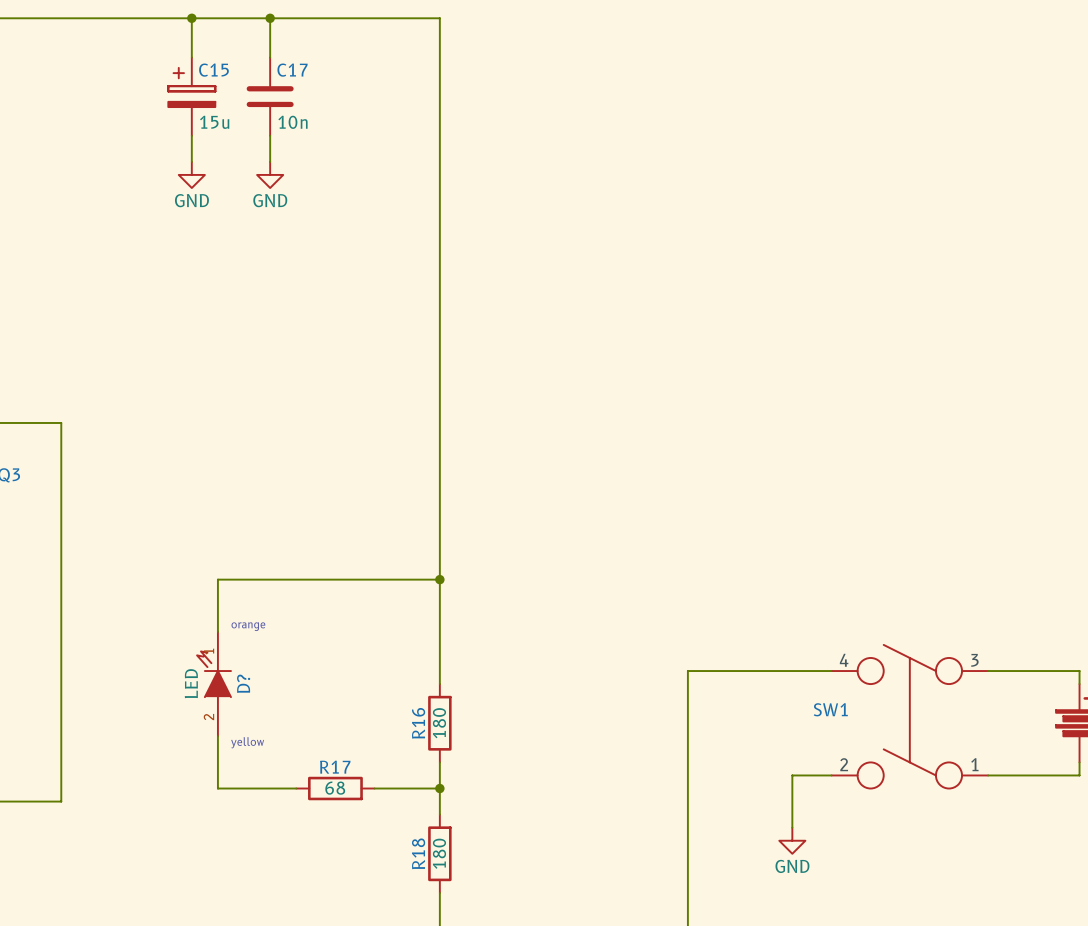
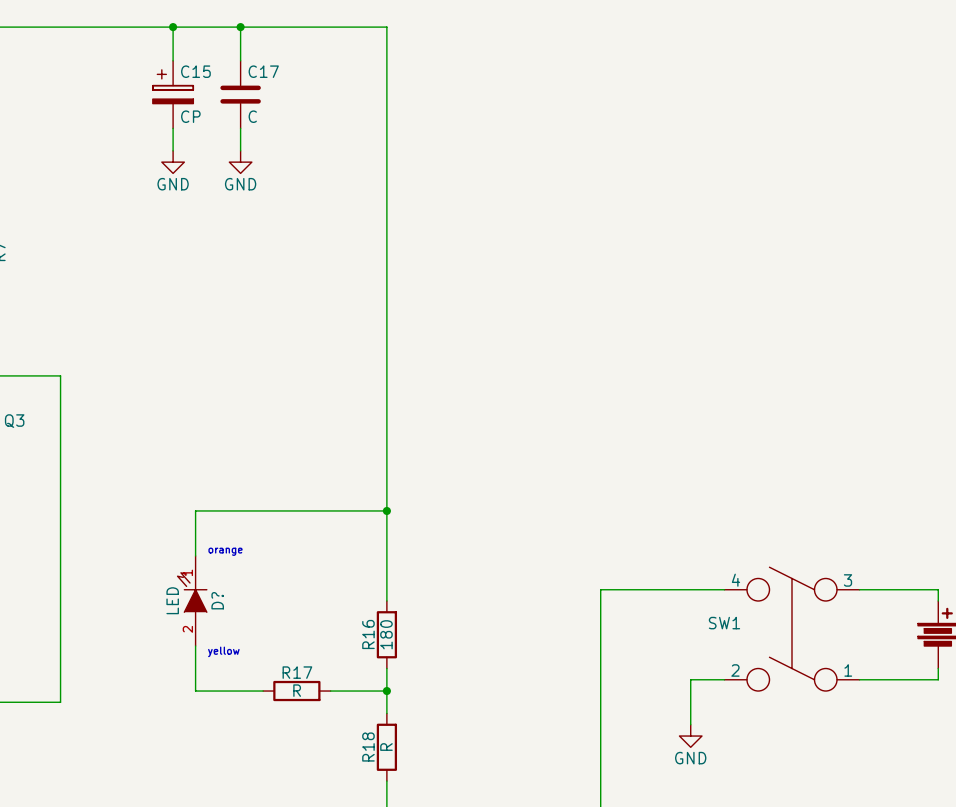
C15 value: 15u (214, 122) -> CP (190, 116)
C17 value: 10n (292, 122) -> C (252, 116)
R17 value: 68 (335, 788) -> R (297, 690)
R18 value: 180 (439, 853) -> R (386, 747)

